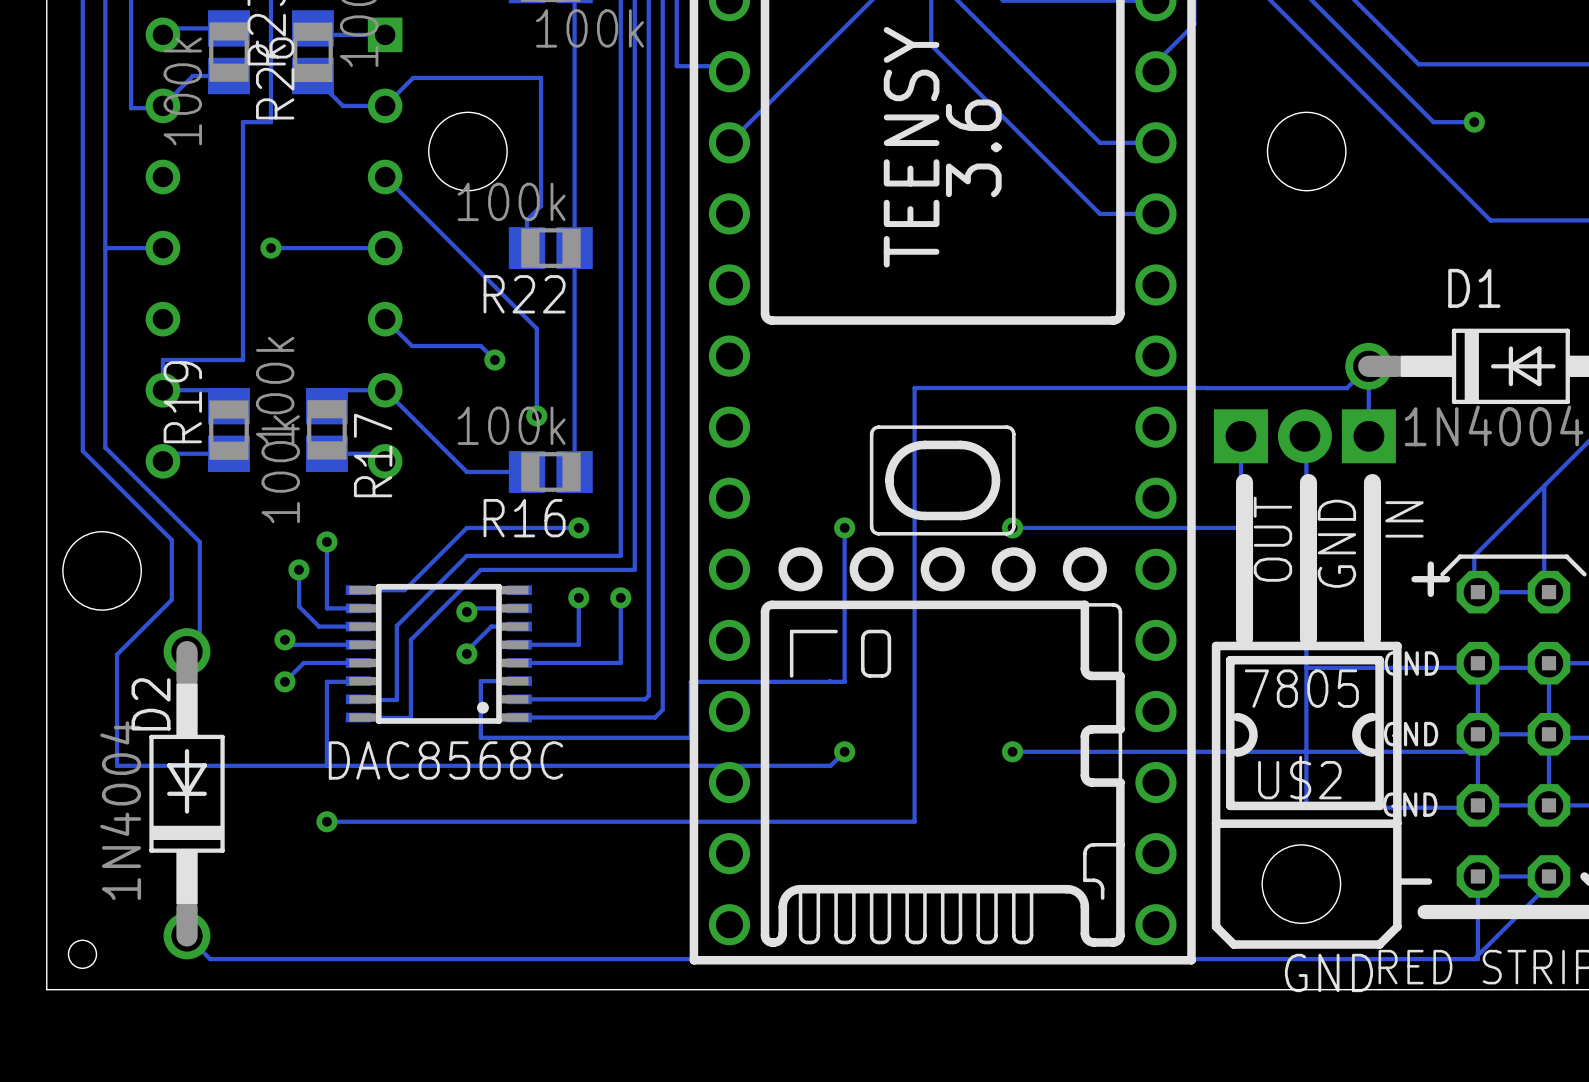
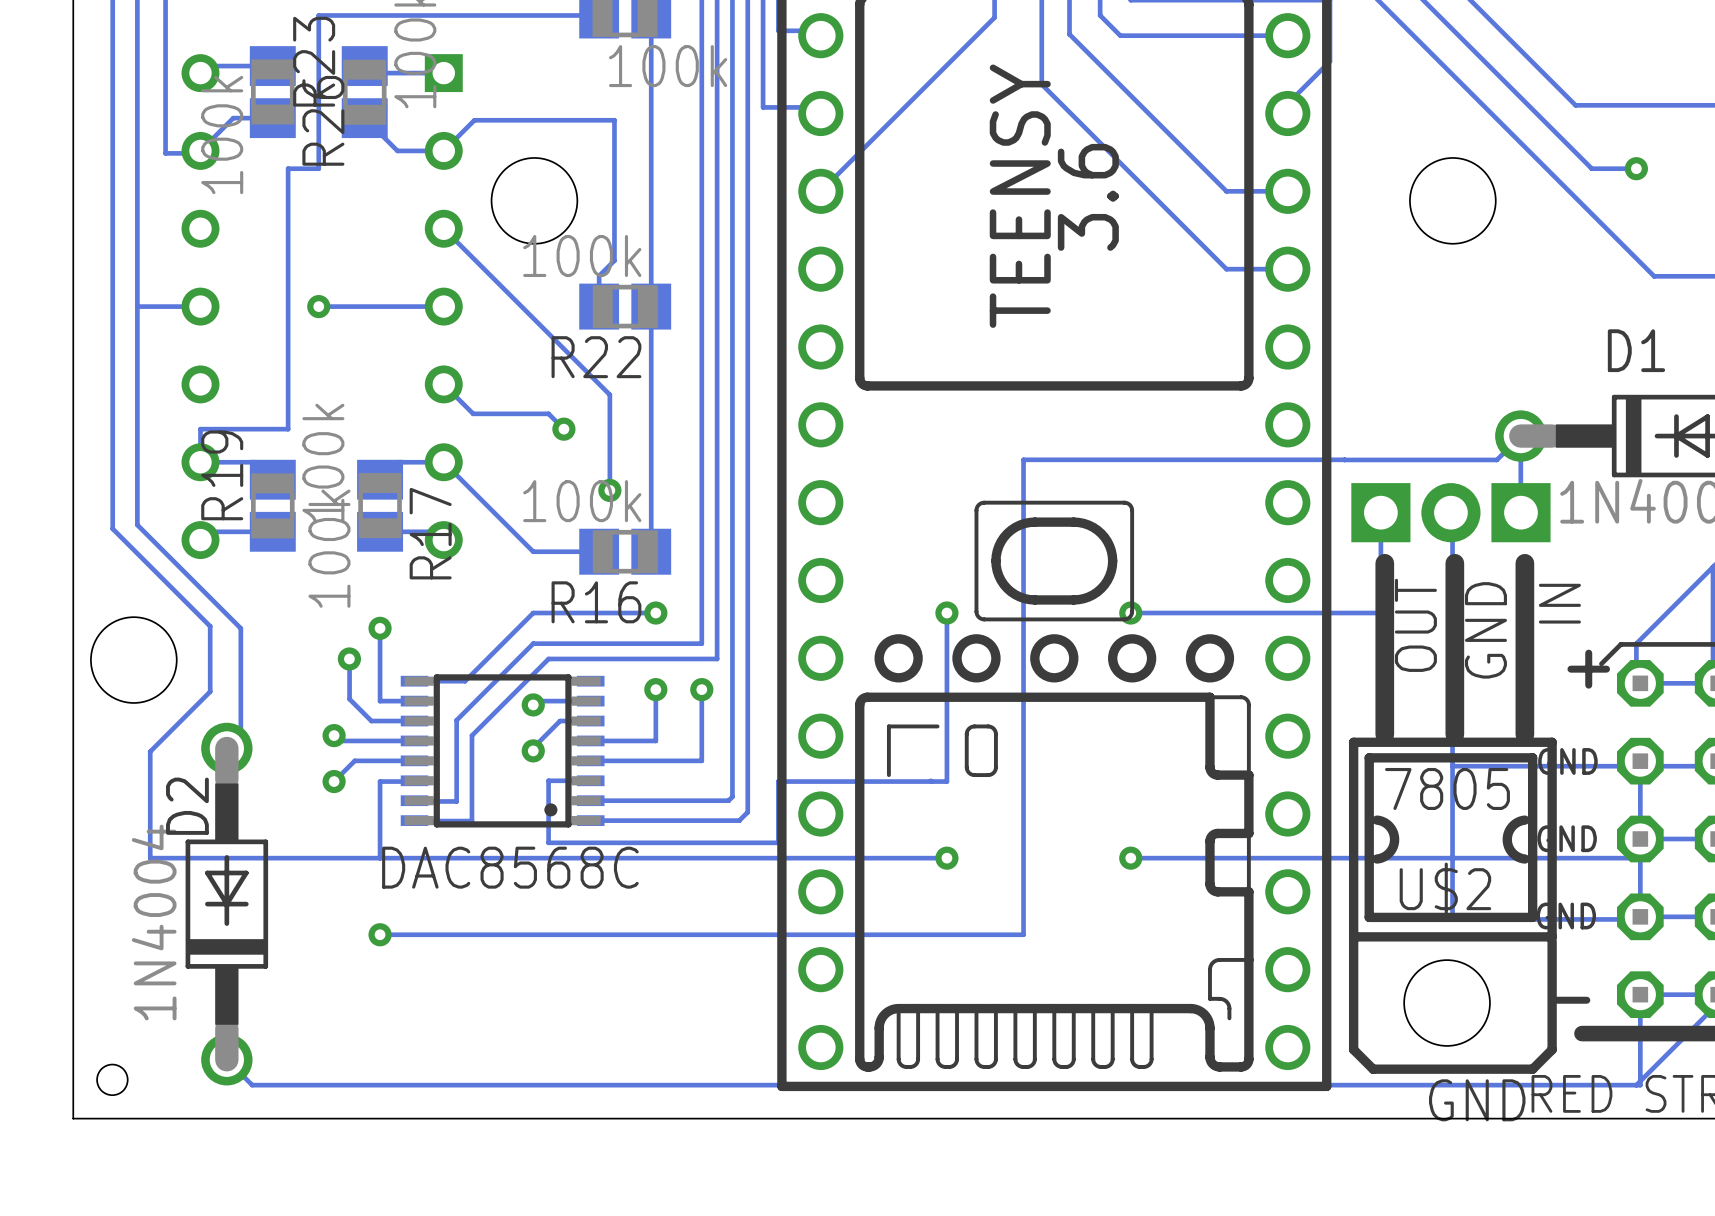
track: (326, 751) (326, 765) -> none
track: (844, 751) (830, 765) (117, 765) (117, 751) -> (946, 858) (150, 858)

